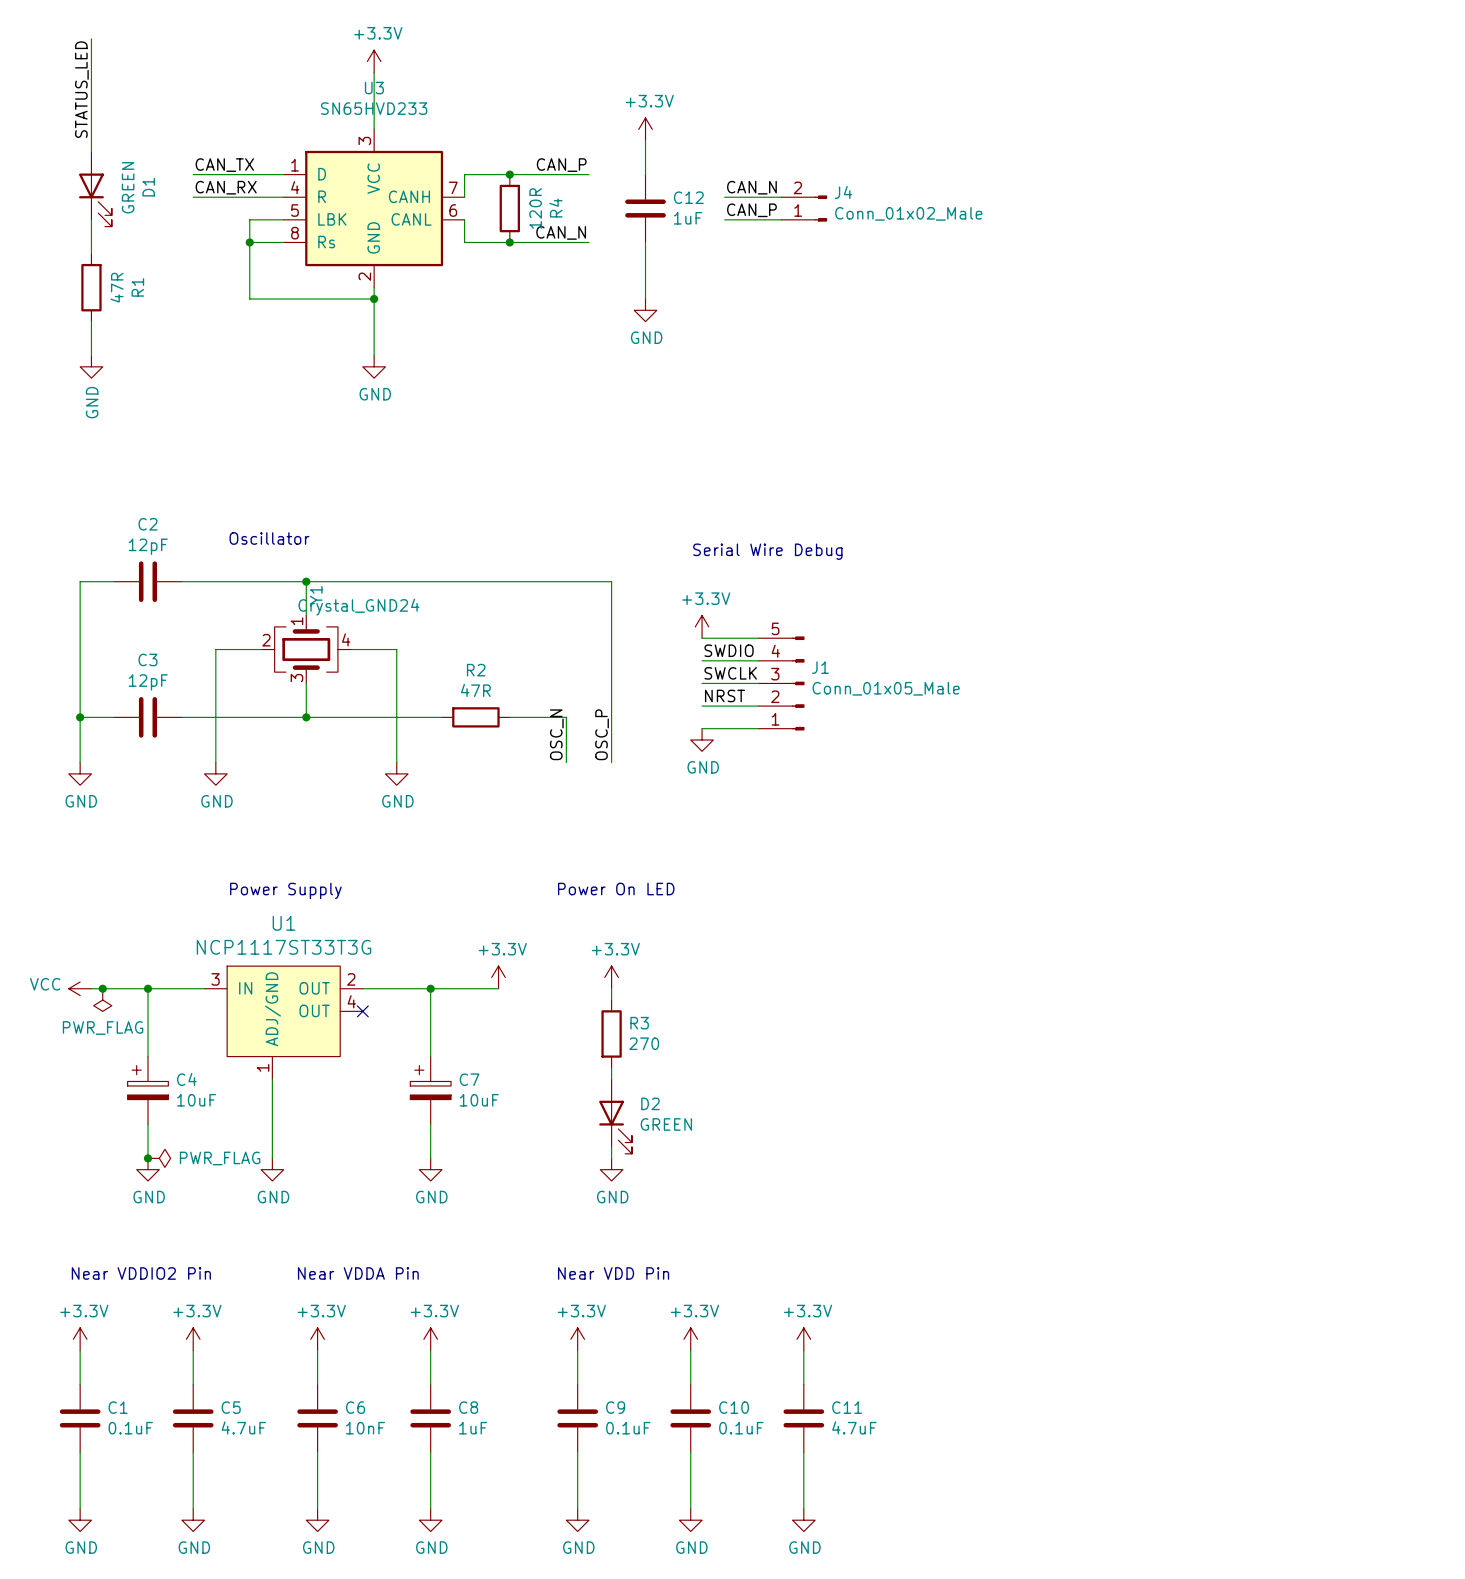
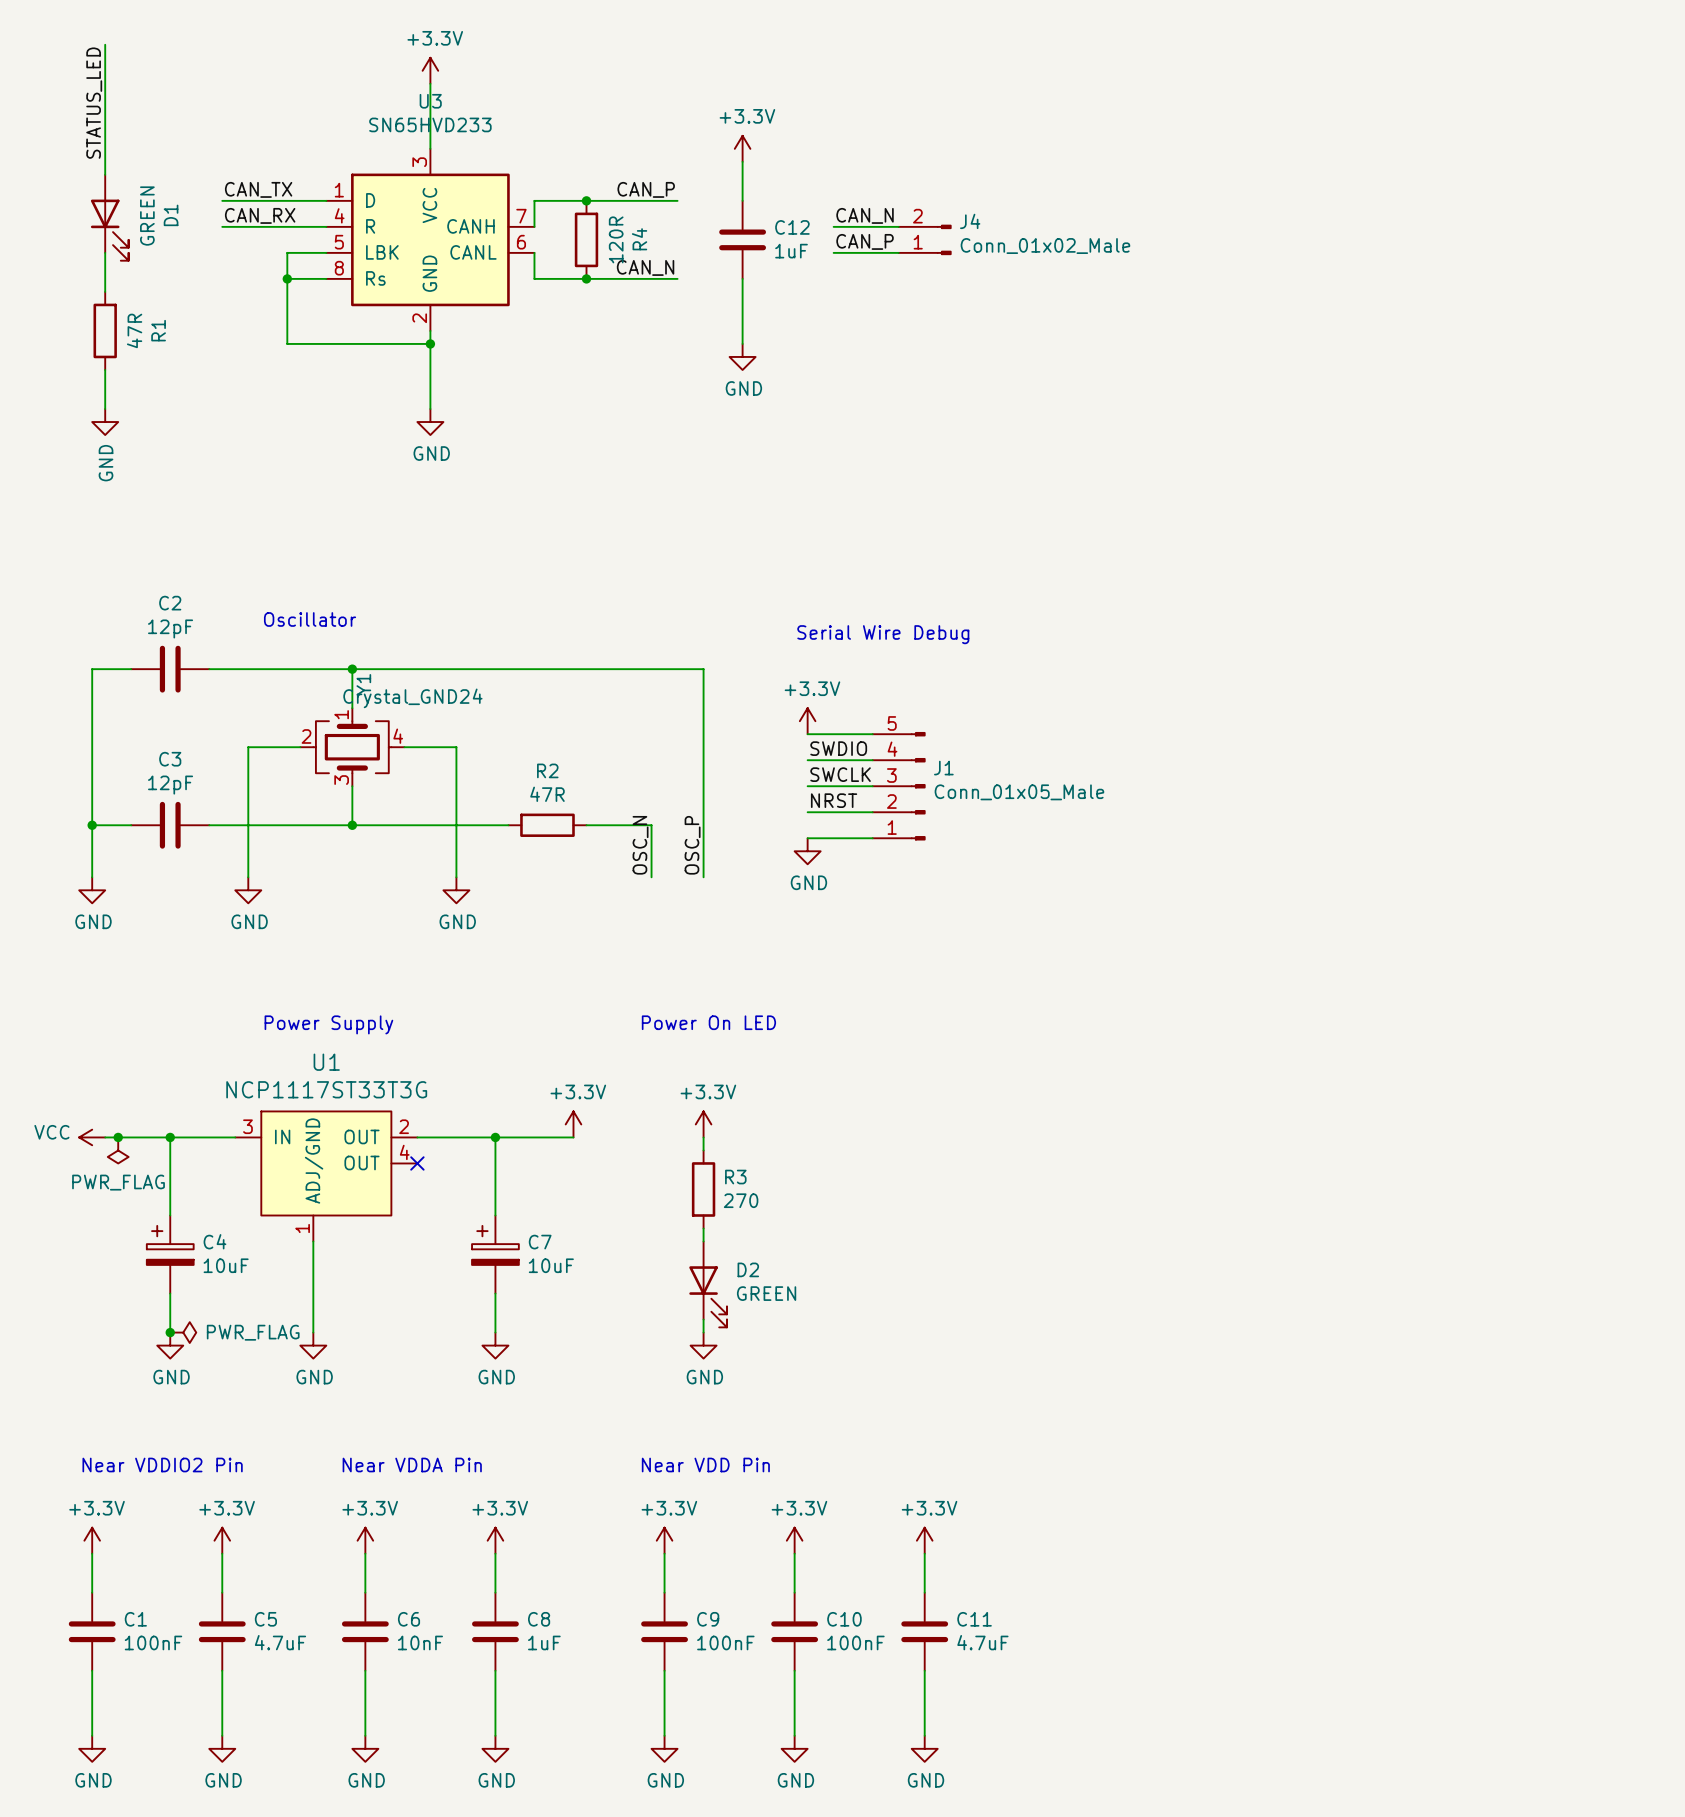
C1 value: 0.1uF (130, 1428) -> 100nF (153, 1642)
C9 value: 0.1uF (628, 1428) -> 100nF (725, 1642)
C10 value: 0.1uF (741, 1428) -> 100nF (855, 1642)

